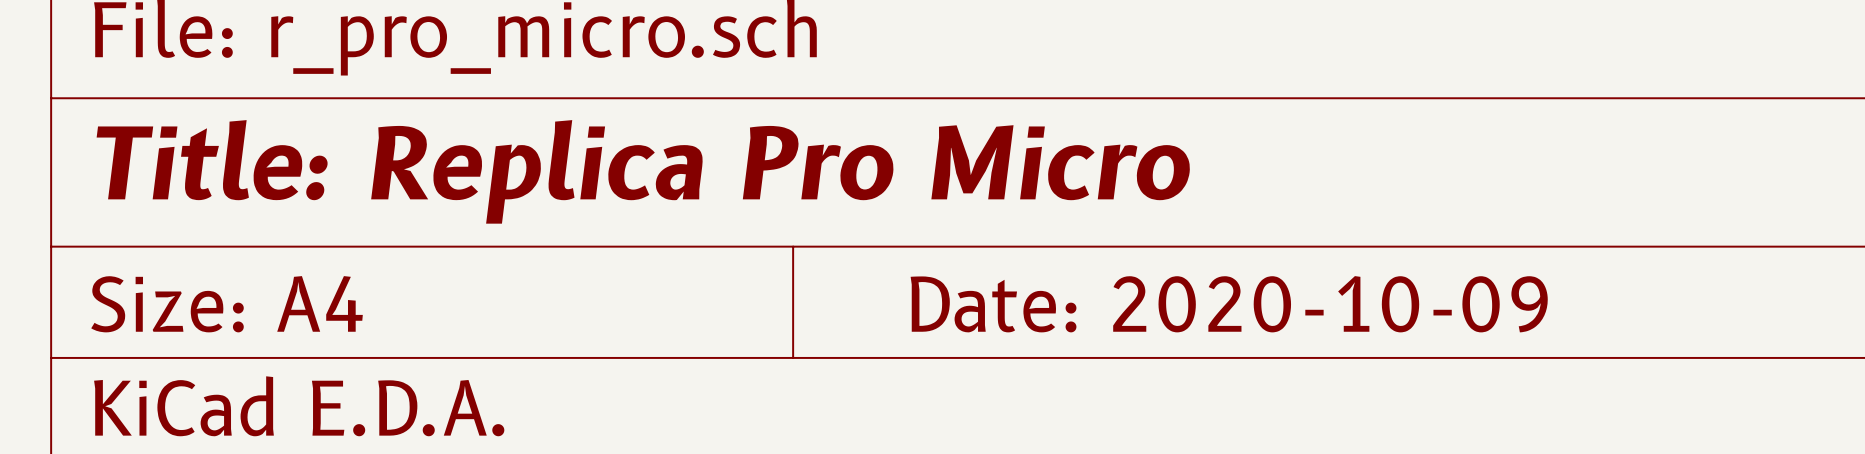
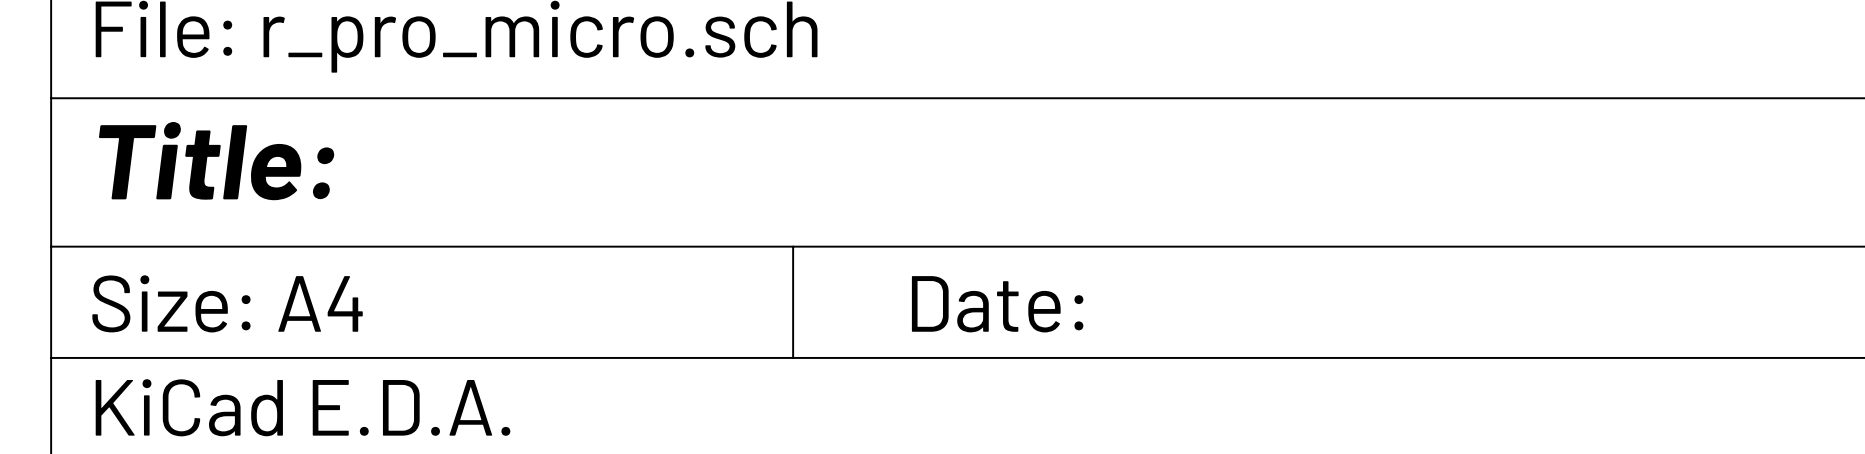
title block: Title: Replica Pro Micro (643, 171) -> Title: (216, 161)
title block: Date: 2020-10-09 (1229, 304) -> Date: (997, 304)

